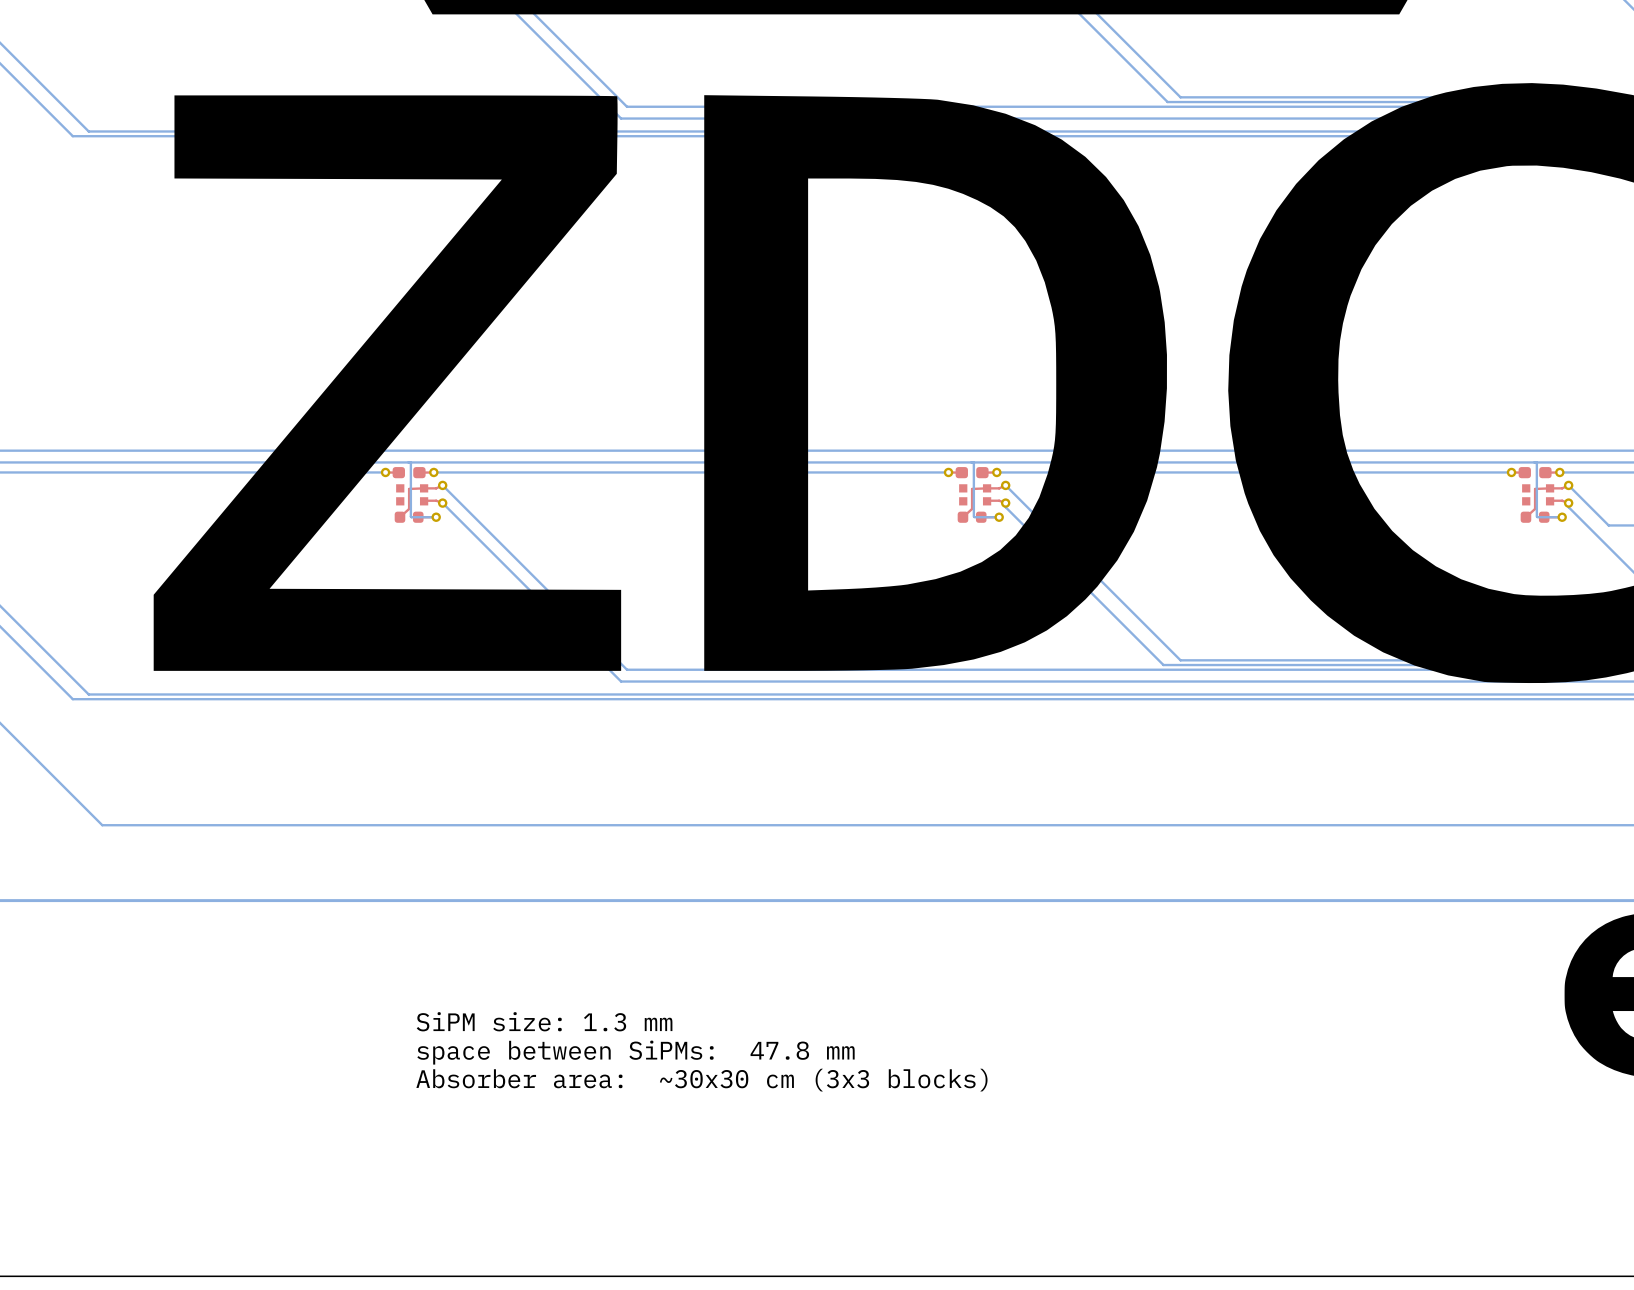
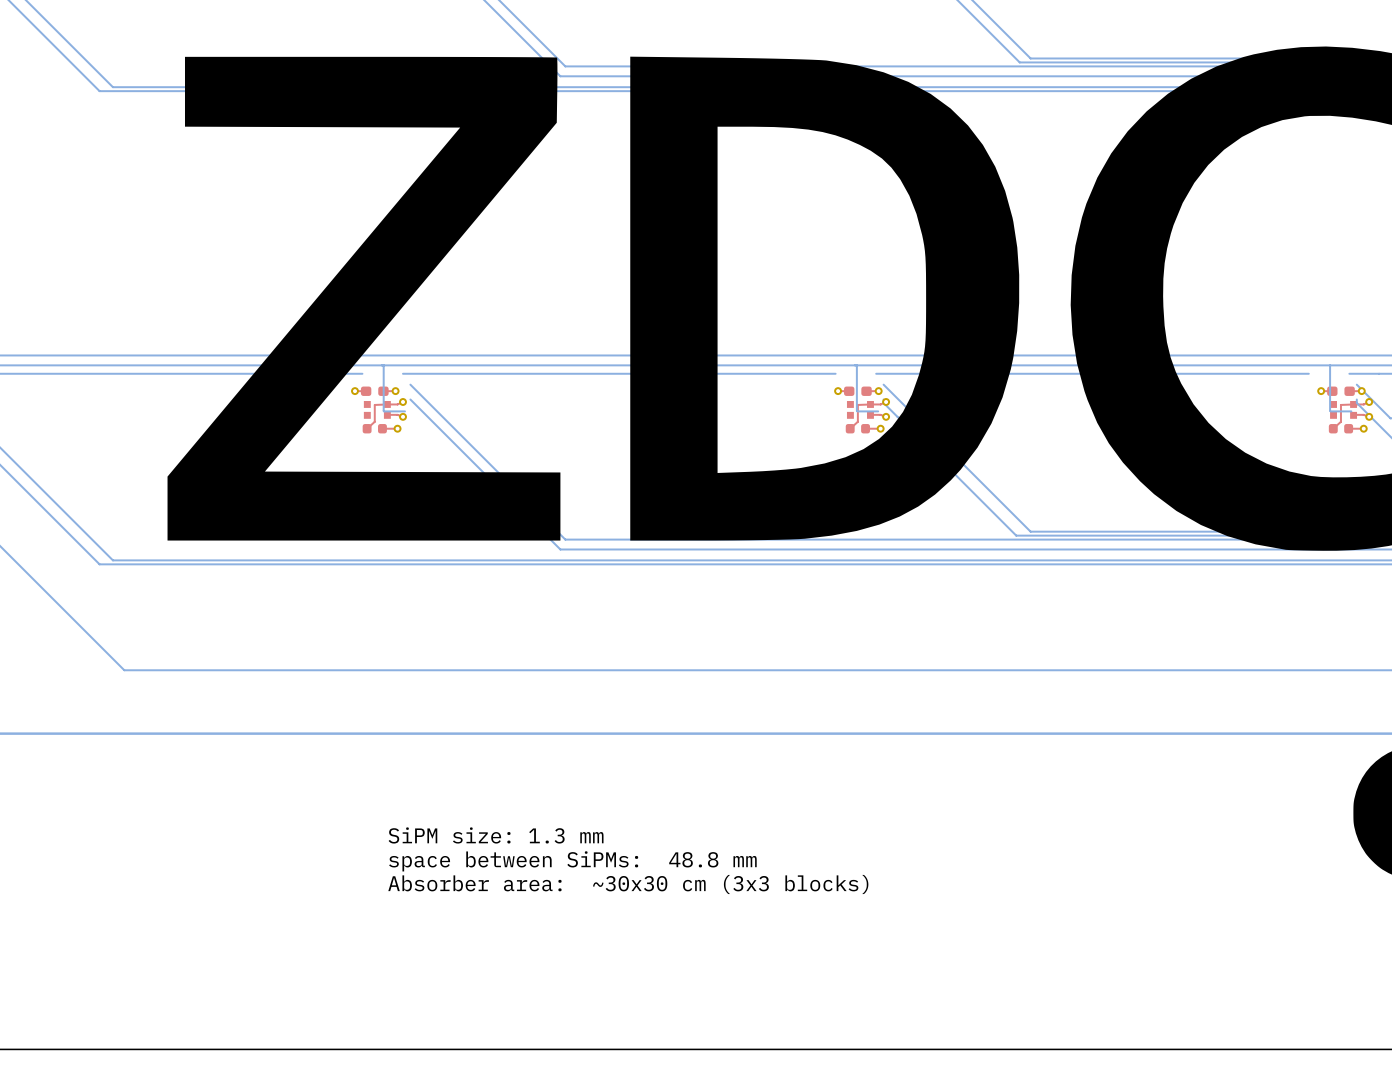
part position: (414, 494) -> (378, 409)
part position: (977, 494) -> (862, 409)
part position: (1540, 494) -> (1345, 409)
text: space between SiPMs: 47.8 mm (635, 1052) -> space between SiPMs: 48.8 mm (572, 861)

